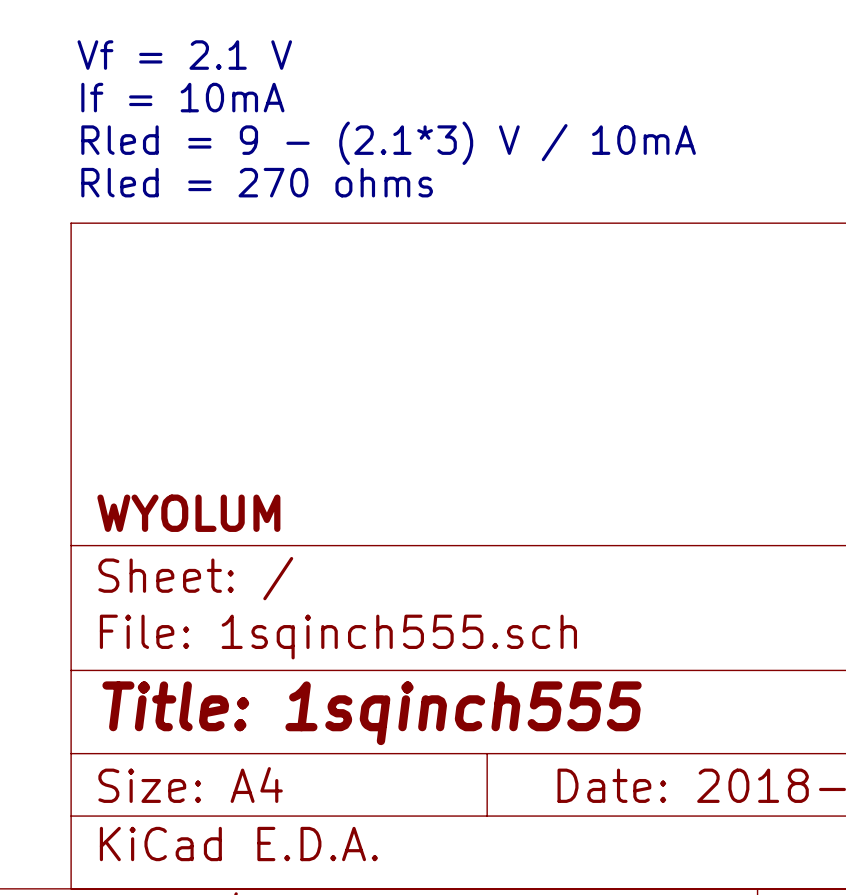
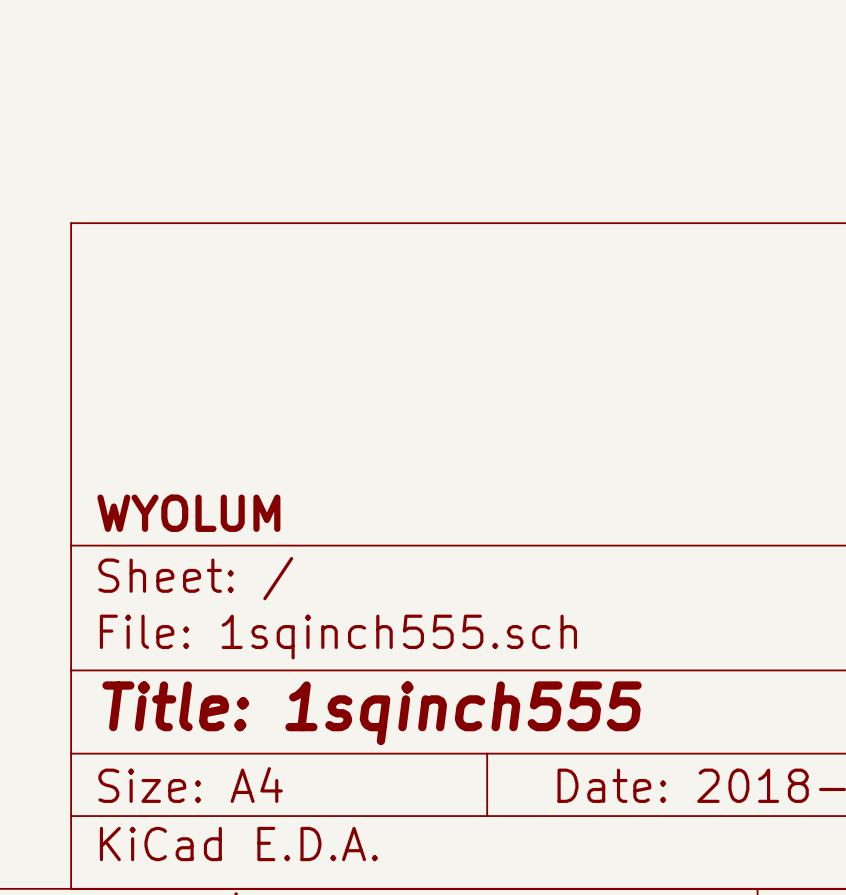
text: Vf = 2.1 V (184, 55) -> none
text: If = 10mA (182, 97) -> none
text: Rled = 9 - (2.1*3) V / 10mA (388, 143) -> none
text: Rled = 270 ohms (257, 182) -> none

